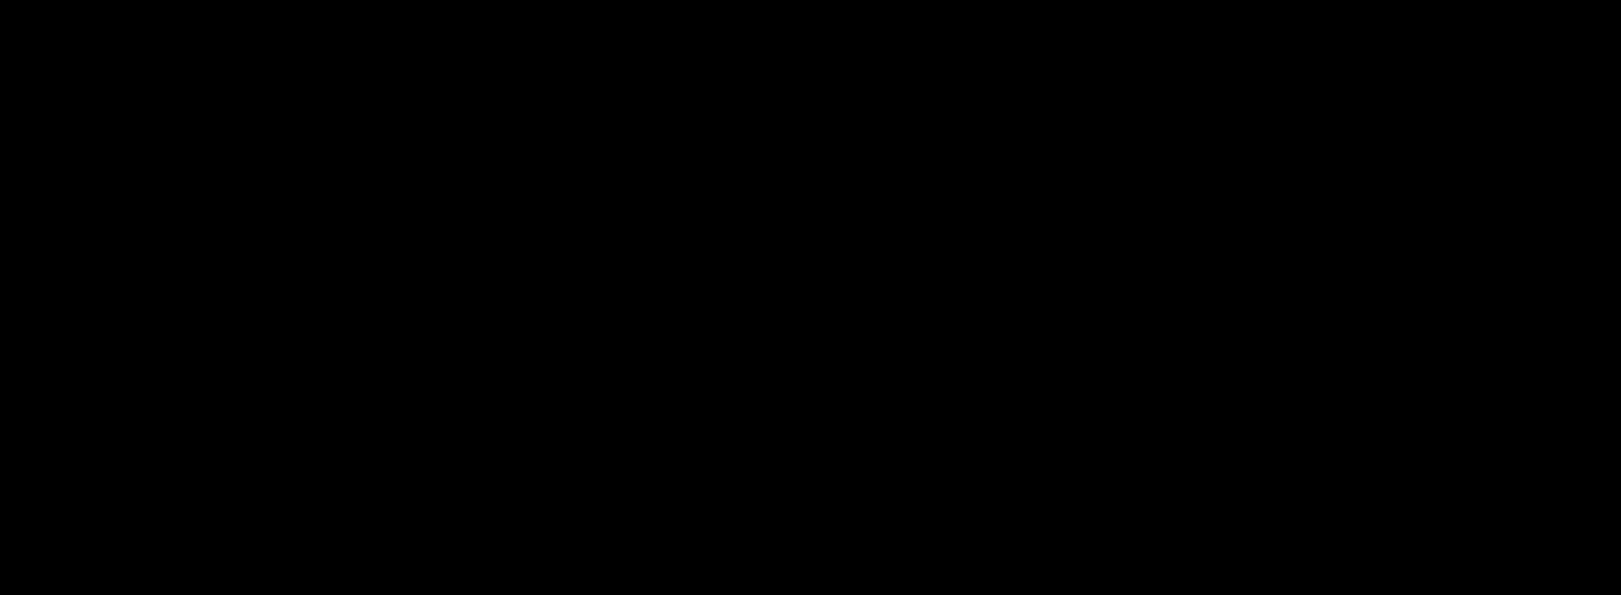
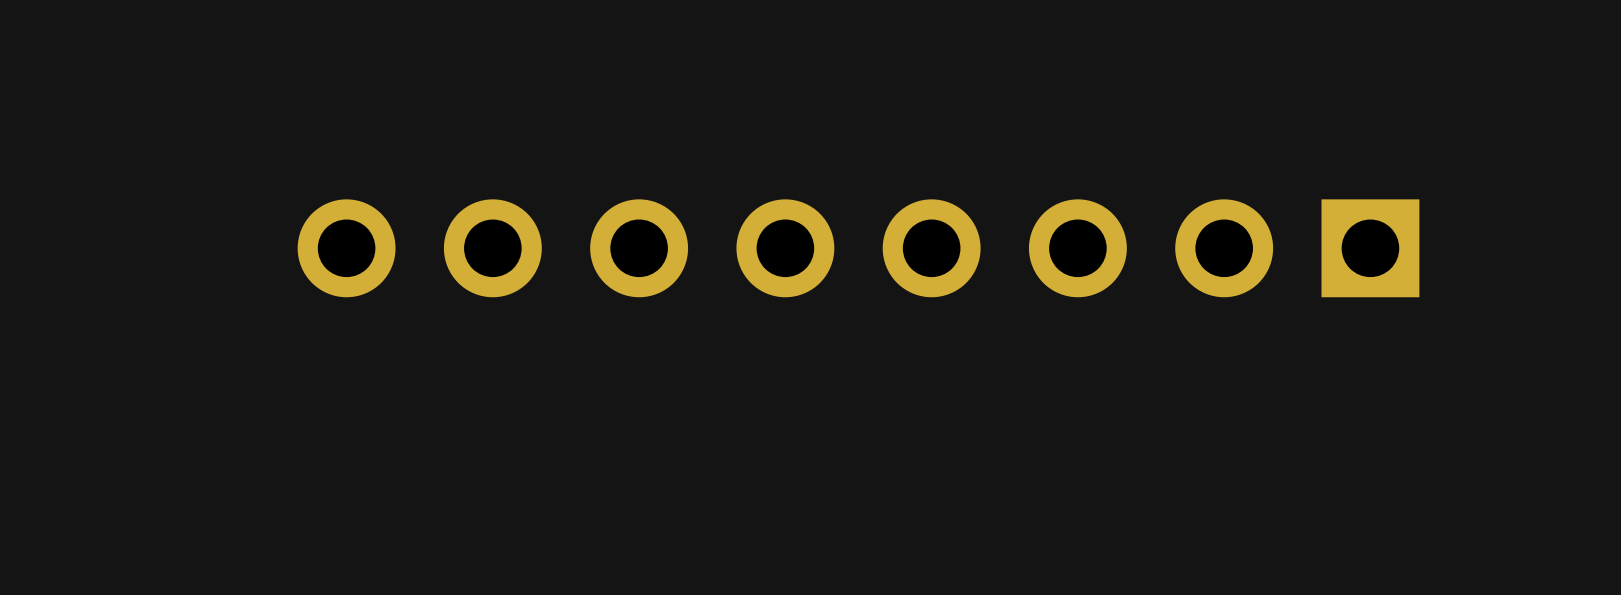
part: none -> (858, 248)

